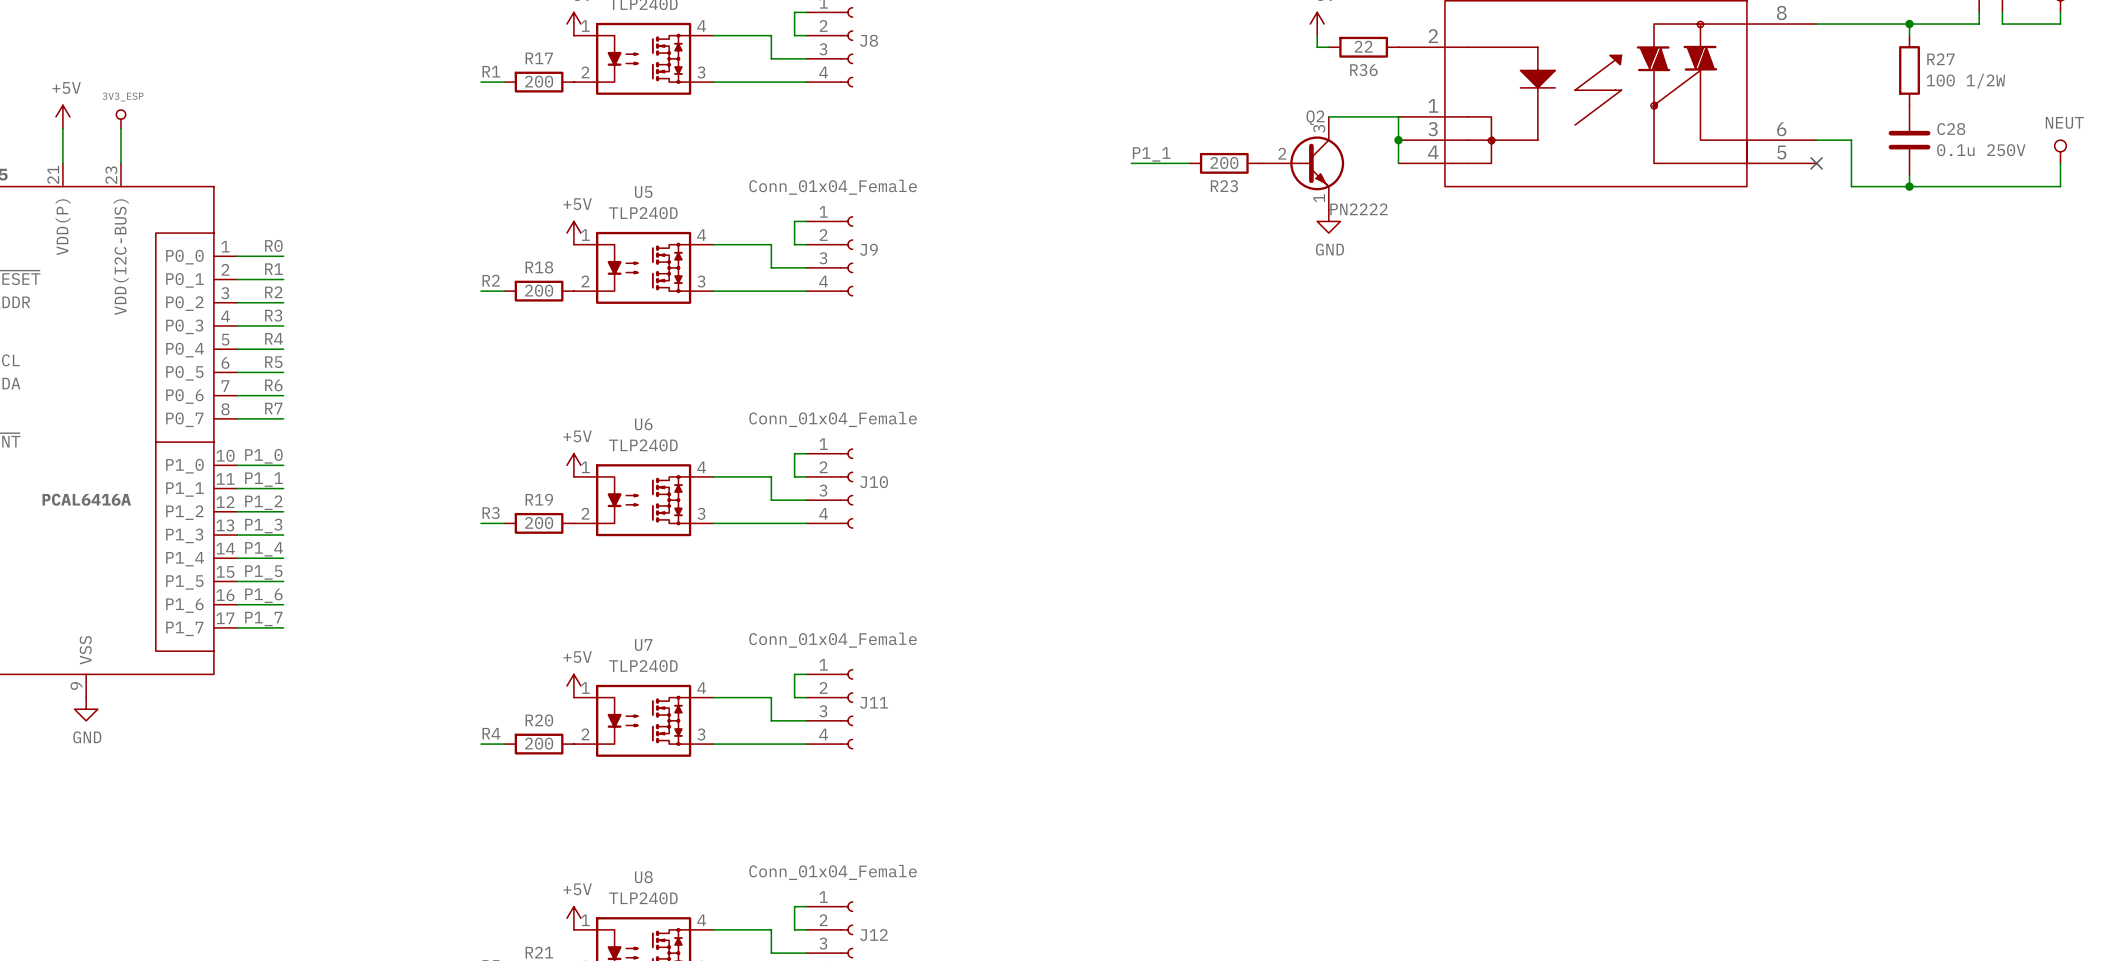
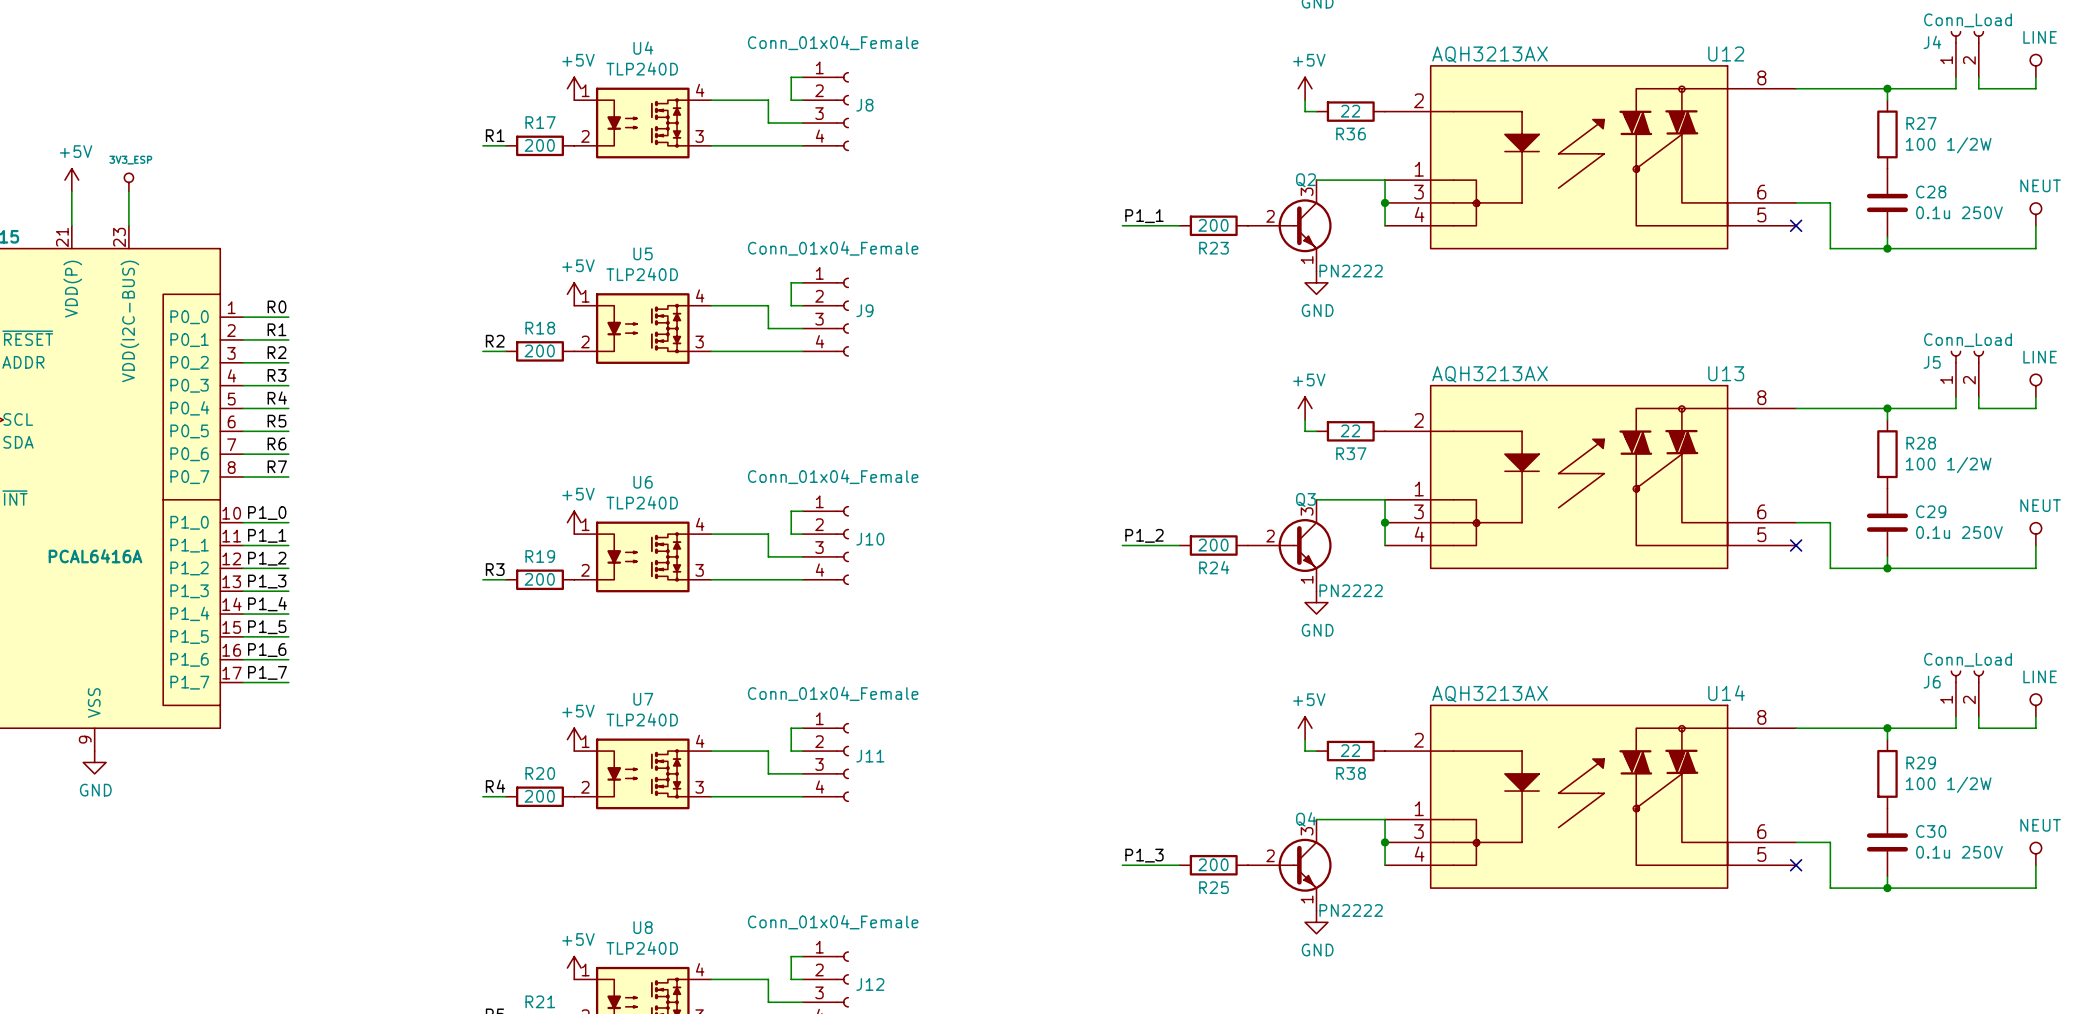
J5: none -> Conn_Load (1967, 373)
power symbol: none -> LINE (2035, 385)
wire: none -> (1955, 397) (1955, 408) (1796, 408)
wire: none -> (1978, 397) (1978, 408) (2035, 408) (2035, 397)
power symbol: none -> +5V (1305, 408)
wire: none -> (1887, 408) (1887, 419)
junction: none -> (1887, 408)
wire: none -> (1305, 419) (1305, 431) (1316, 431)
R37: none -> 22 (1350, 431)
R28: none -> 100 1/2W (1887, 454)
U13: none -> AQH3213AX (1590, 477)
wire: none -> (1316, 499) (1385, 499) (1385, 545)
junction: none -> (1385, 522)
wire: none -> (1796, 522) (1830, 522) (1830, 568) (2035, 568) (2035, 545)
C29: none -> 0.1u 250V (1887, 522)
power symbol: none -> NEUT (2035, 534)
label: none -> P1_2 (1144, 535)
wire: none -> (1122, 545) (1179, 545)
R24: none -> 200 (1213, 545)
Q3: none -> PN2222 (1289, 545)
no-connect mark: none -> (1796, 545)
wire: none -> (1887, 556) (1887, 568)
junction: none -> (1887, 568)
power symbol: none -> GND (1316, 602)
J6: none -> Conn_Load (1967, 693)
power symbol: none -> LINE (2035, 705)
wire: none -> (1955, 716) (1955, 728) (1796, 728)
wire: none -> (1978, 716) (1978, 728) (2035, 728) (2035, 716)
power symbol: none -> +5V (1305, 728)
wire: none -> (1887, 728) (1887, 739)
junction: none -> (1887, 728)
wire: none -> (1305, 739) (1305, 751) (1316, 751)
R38: none -> 22 (1350, 751)
R29: none -> 100 1/2W (1887, 773)
U14: none -> AQH3213AX (1590, 796)
wire: none -> (1316, 819) (1385, 819) (1385, 865)
junction: none -> (1385, 842)
wire: none -> (1796, 842) (1830, 842) (1830, 888) (2035, 888) (2035, 865)
C30: none -> 0.1u 250V (1887, 842)
power symbol: none -> NEUT (2035, 853)
label: none -> P1_3 (1144, 855)
wire: none -> (1122, 865) (1179, 865)
R25: none -> 200 (1213, 865)
Q4: none -> PN2222 (1289, 865)
no-connect mark: none -> (1796, 865)
wire: none -> (1887, 876) (1887, 888)
junction: none -> (1887, 888)
power symbol: none -> GND (1316, 922)

